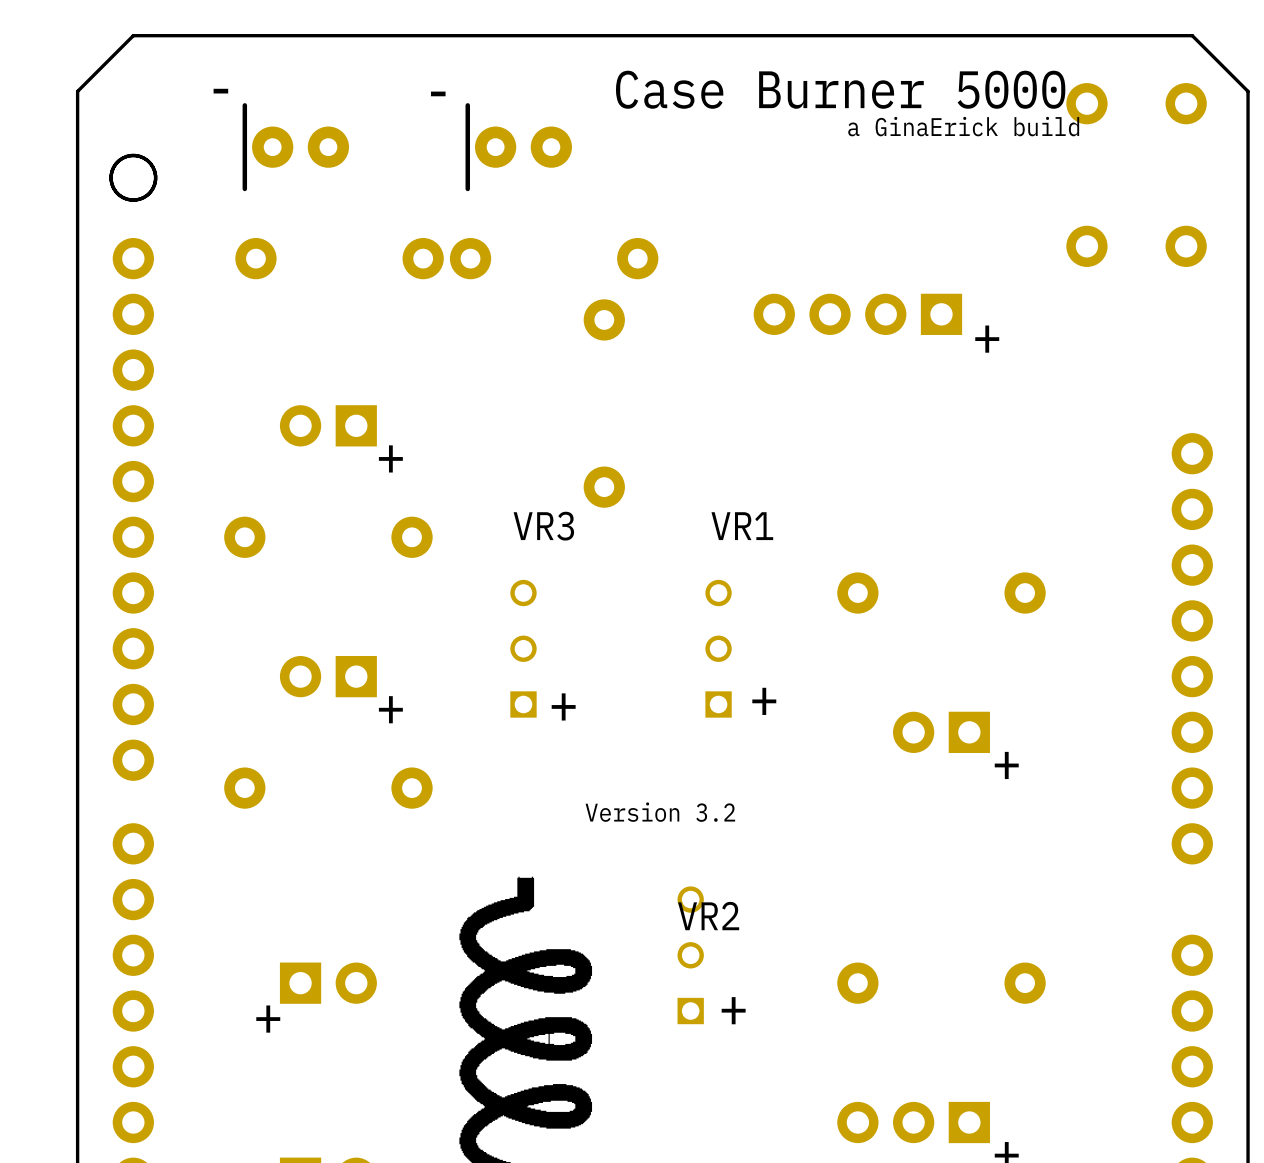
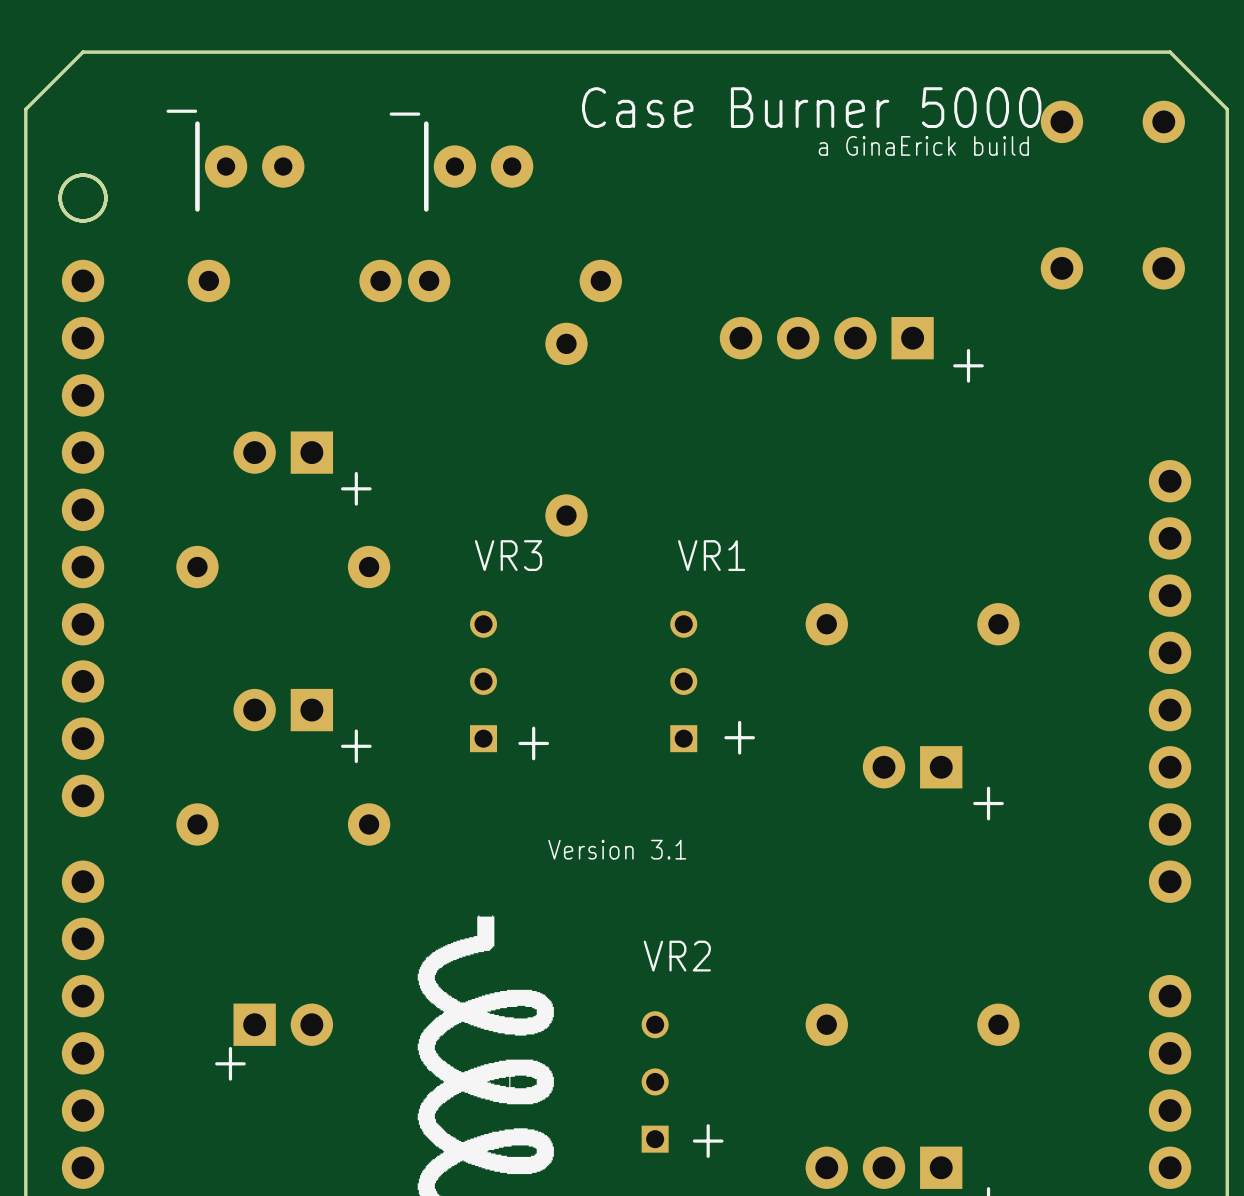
text: Version 3.2 (660, 812) -> Version 3.1 (617, 849)
part position: (690, 955) -> (655, 1081)
text position: + (733, 1010) -> + (708, 1141)

